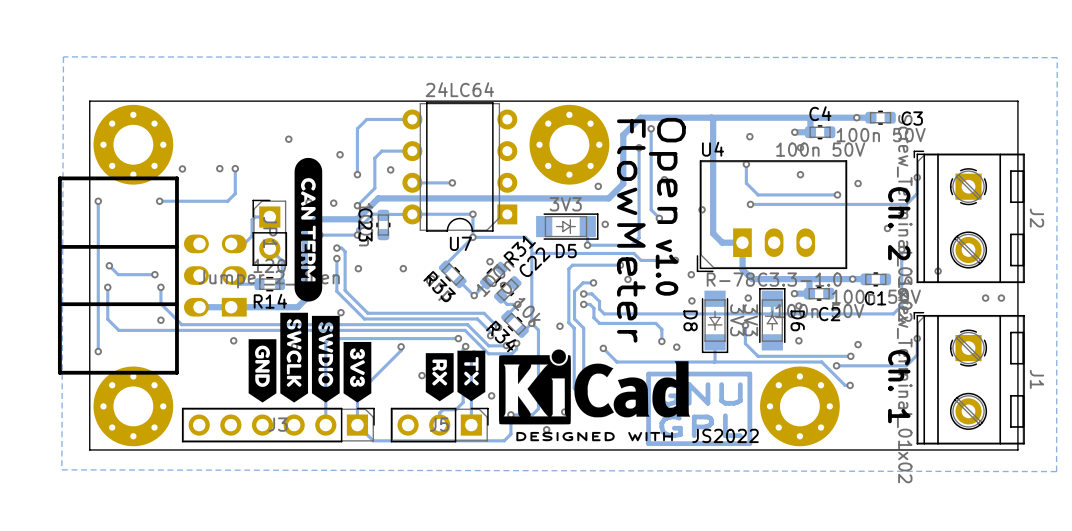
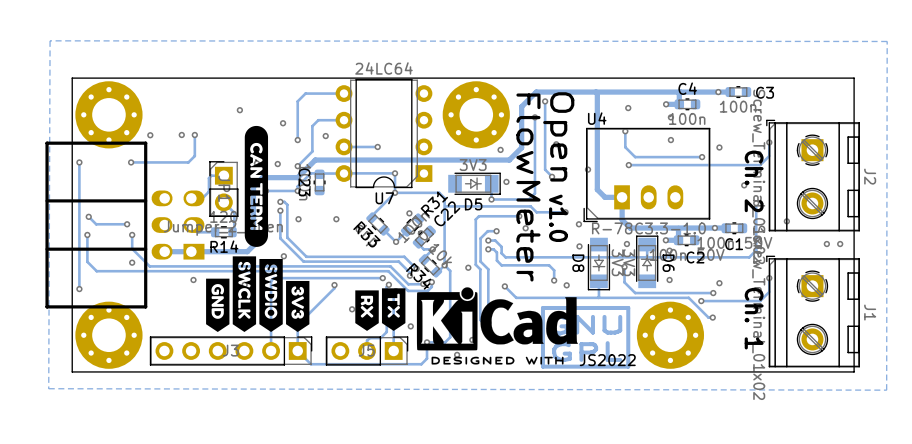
C3 value: 100n 50V (881, 135) -> 100n (738, 106)
C4 value: 100n 50V (820, 149) -> 100n (687, 118)

